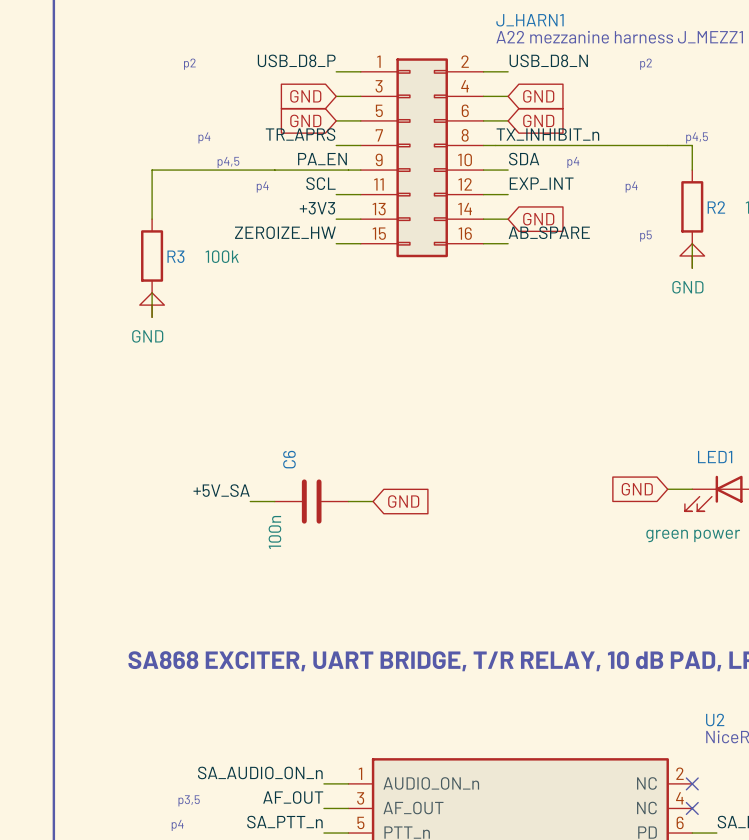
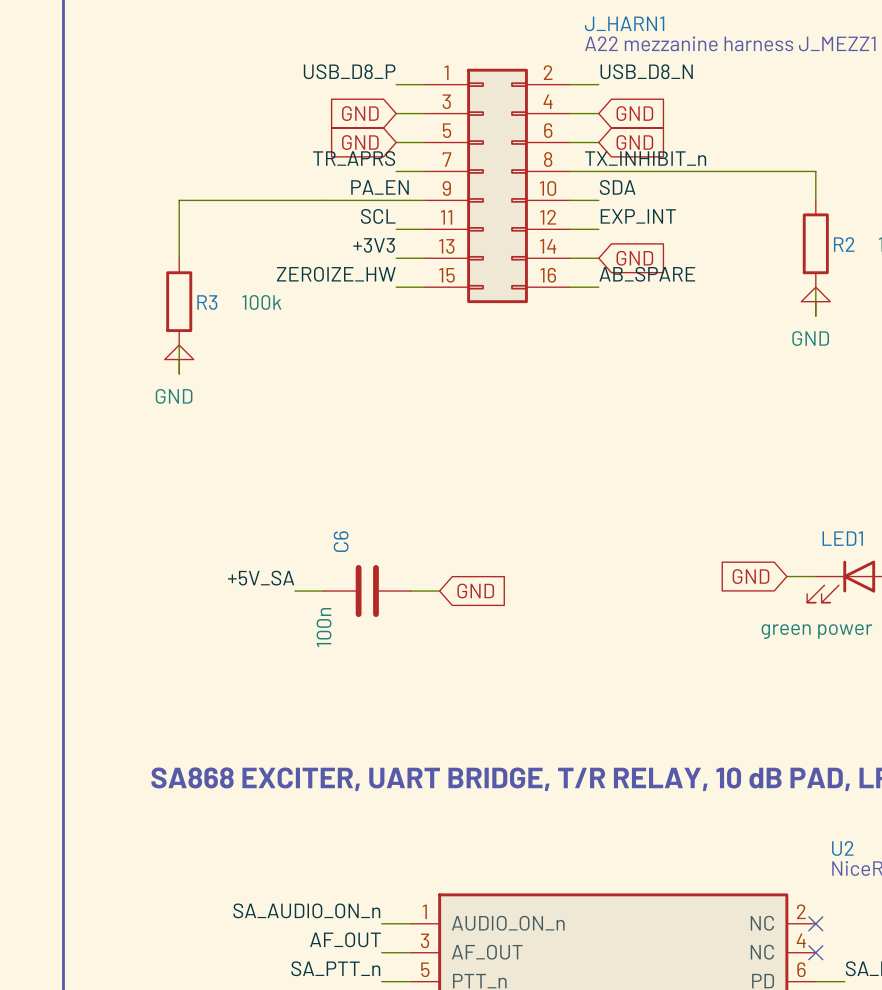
text: p2 (189, 64) -> none
text: p2 (646, 64) -> none
text: p4 (204, 137) -> none
text: p4,5 (697, 137) -> none
text: p4,5 (228, 162) -> none
text: p4 (573, 162) -> none
text: p4 (262, 187) -> none
text: p4 (631, 187) -> none
text: p5 (645, 236) -> none
text: p3,5 (189, 800) -> none
text: p4 (177, 825) -> none

